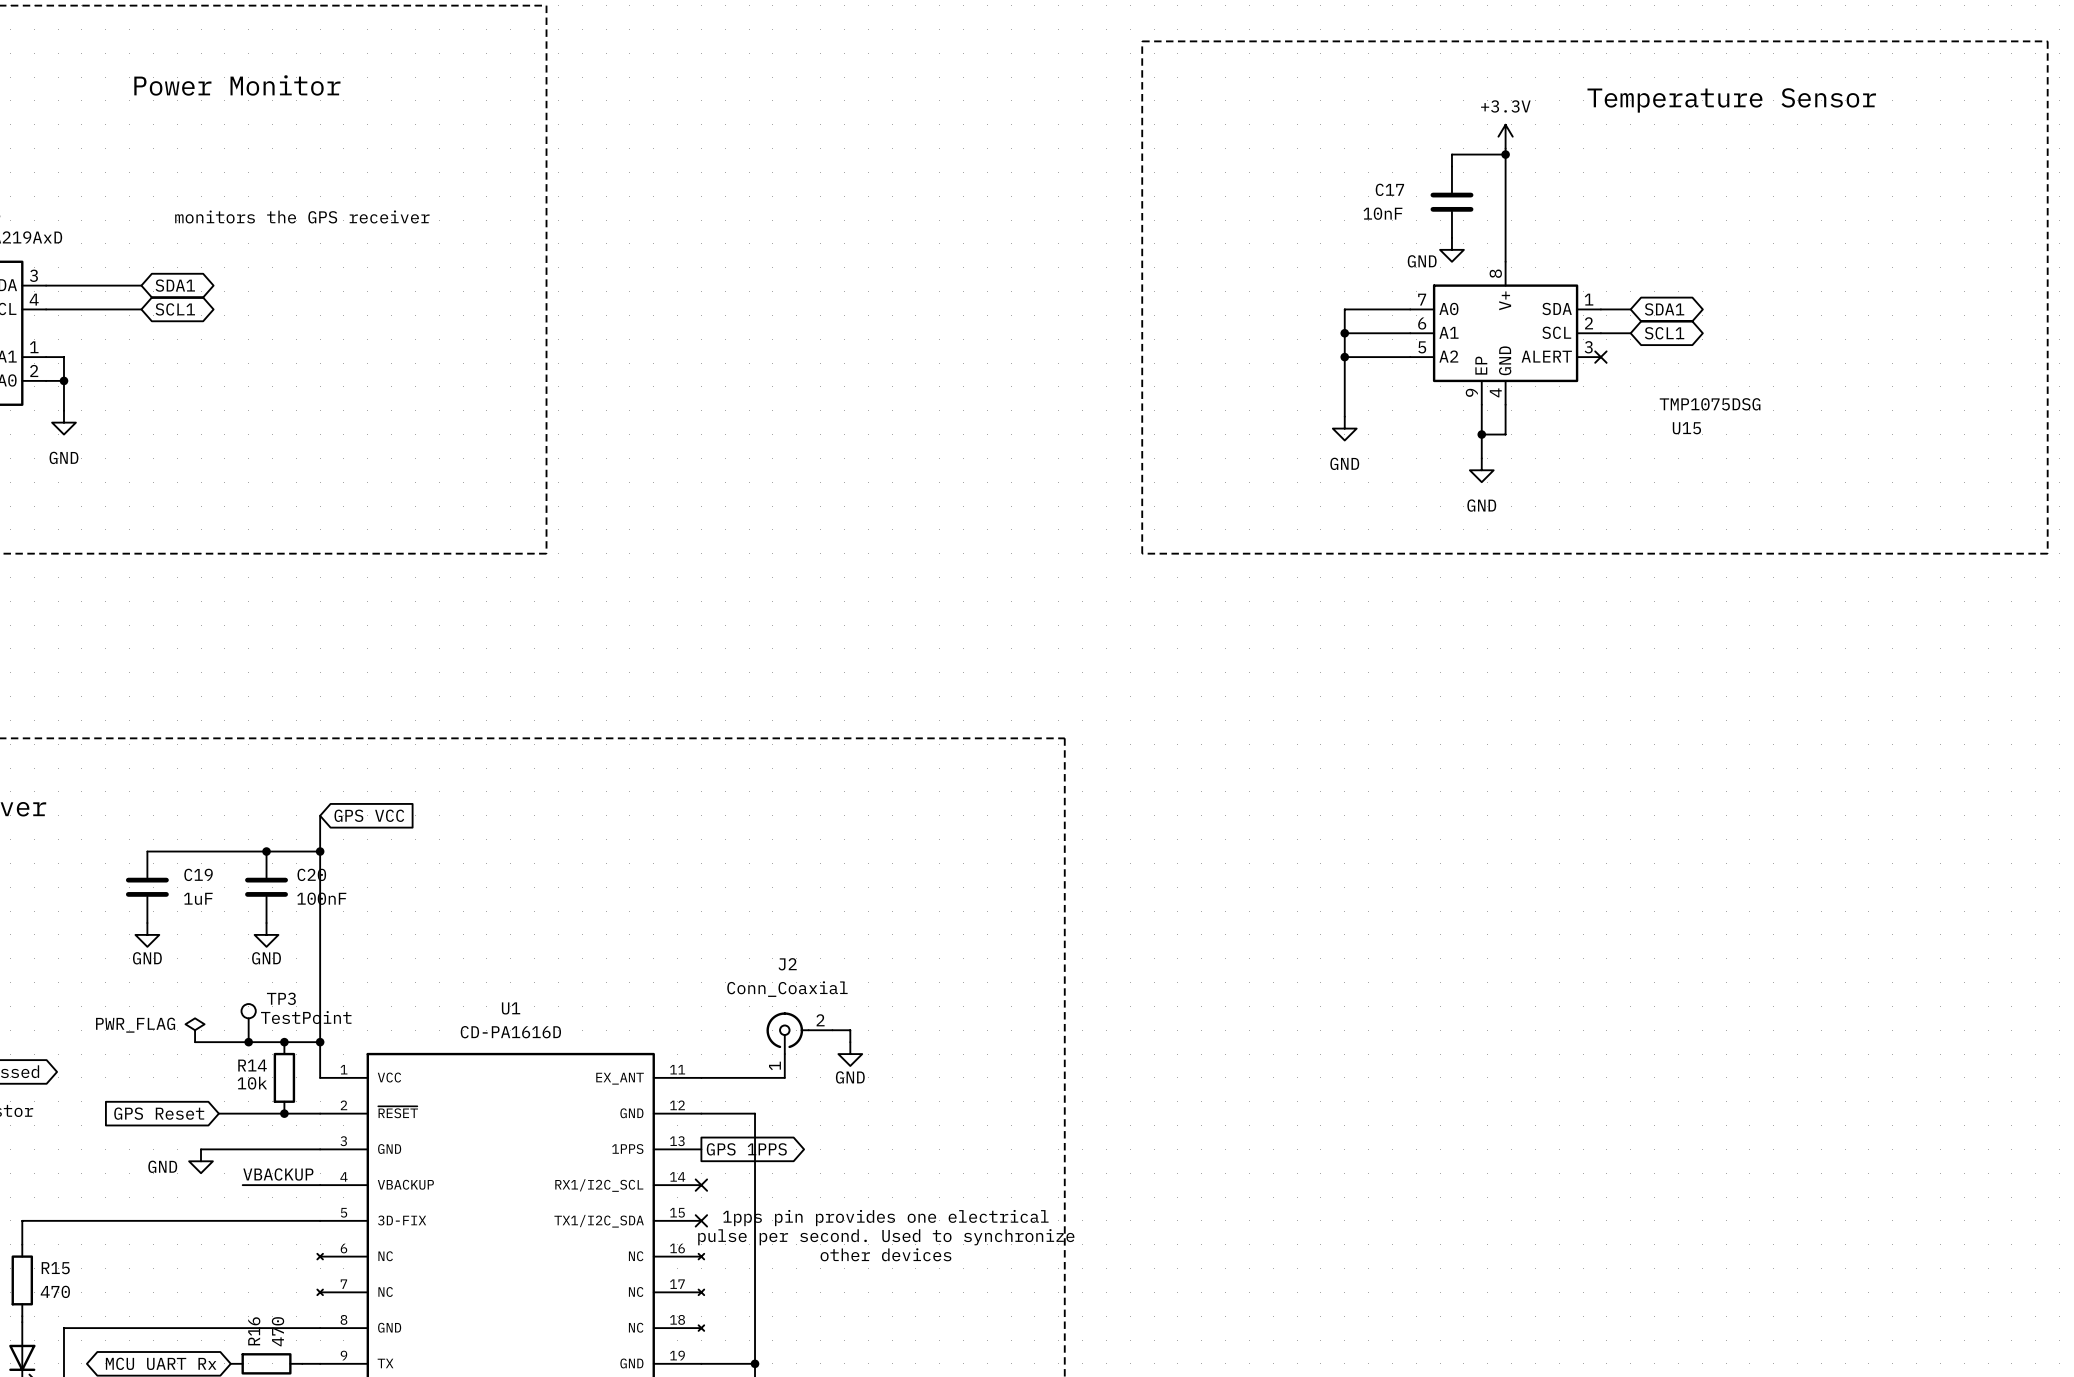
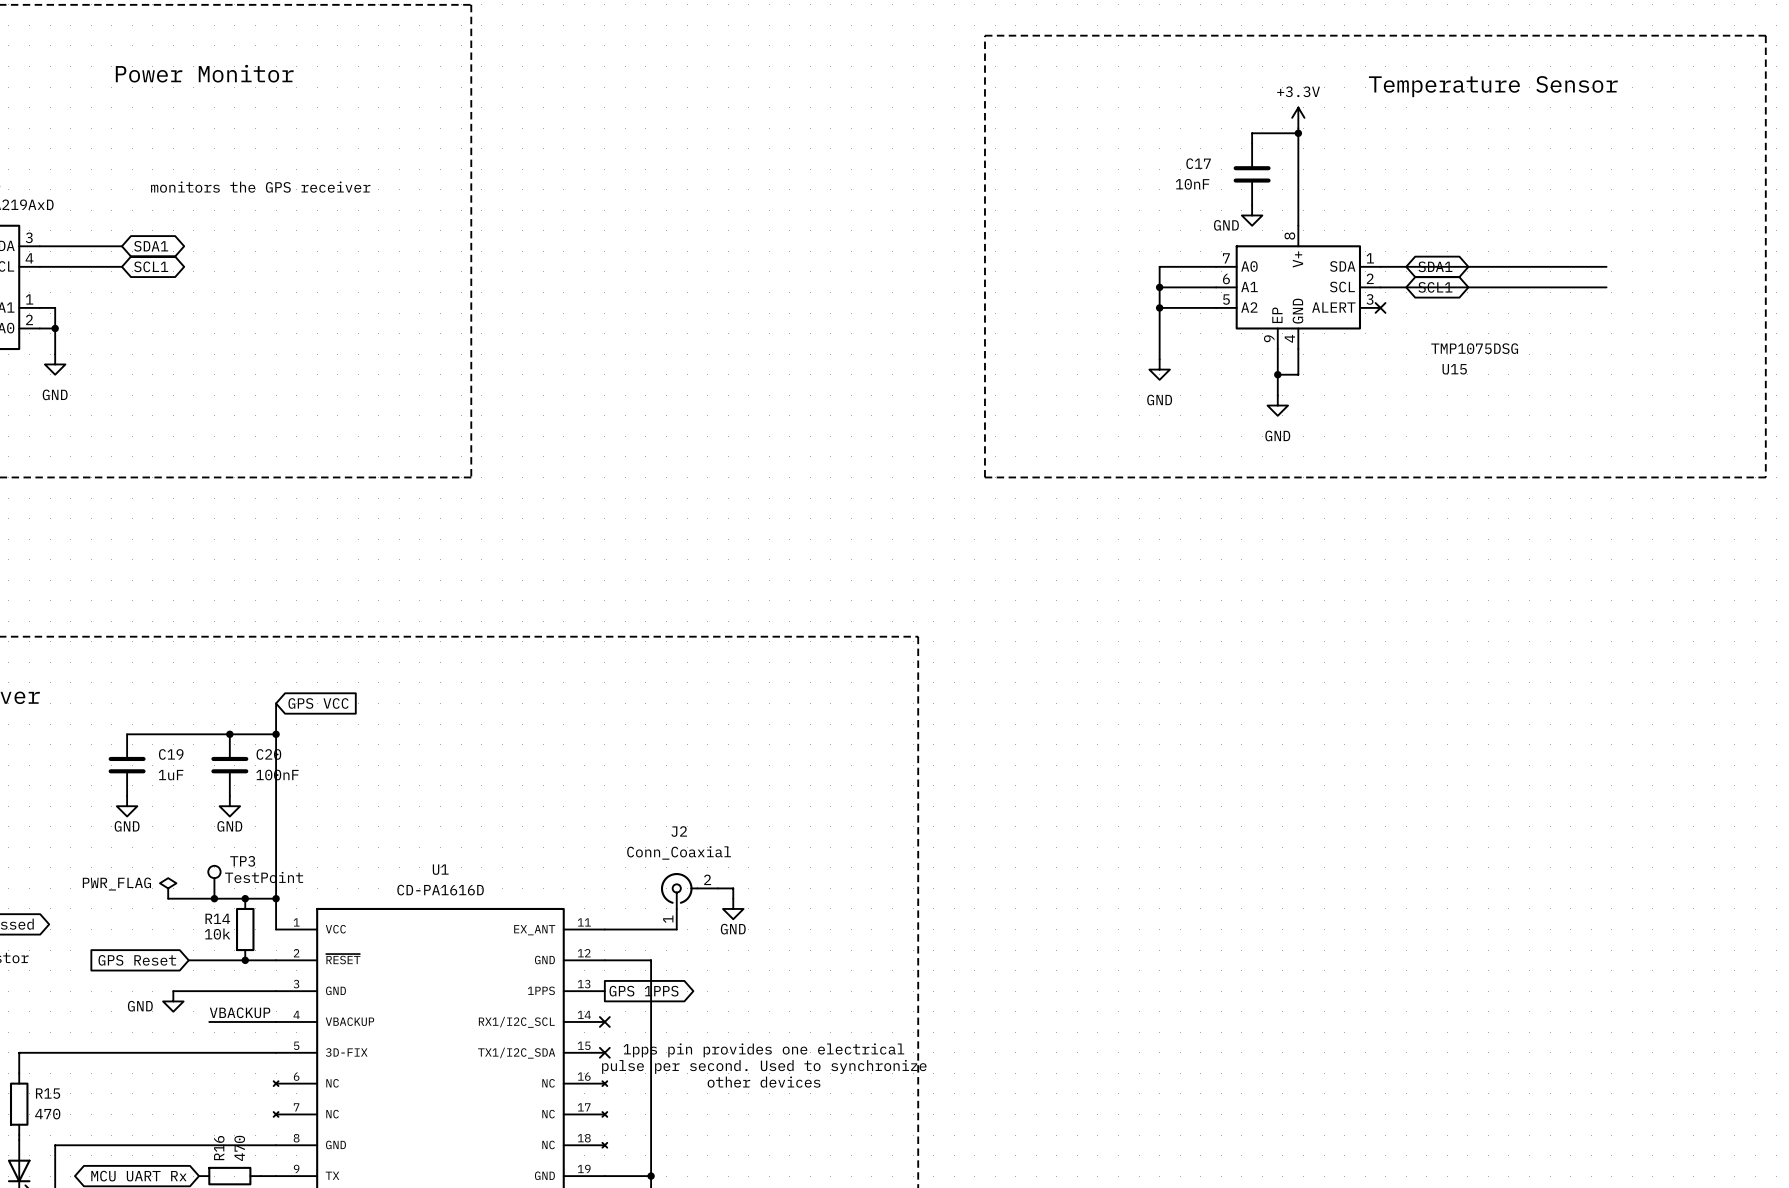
wire: none -> (1406, 266) (1606, 266)
wire: none -> (1406, 287) (1606, 287)

